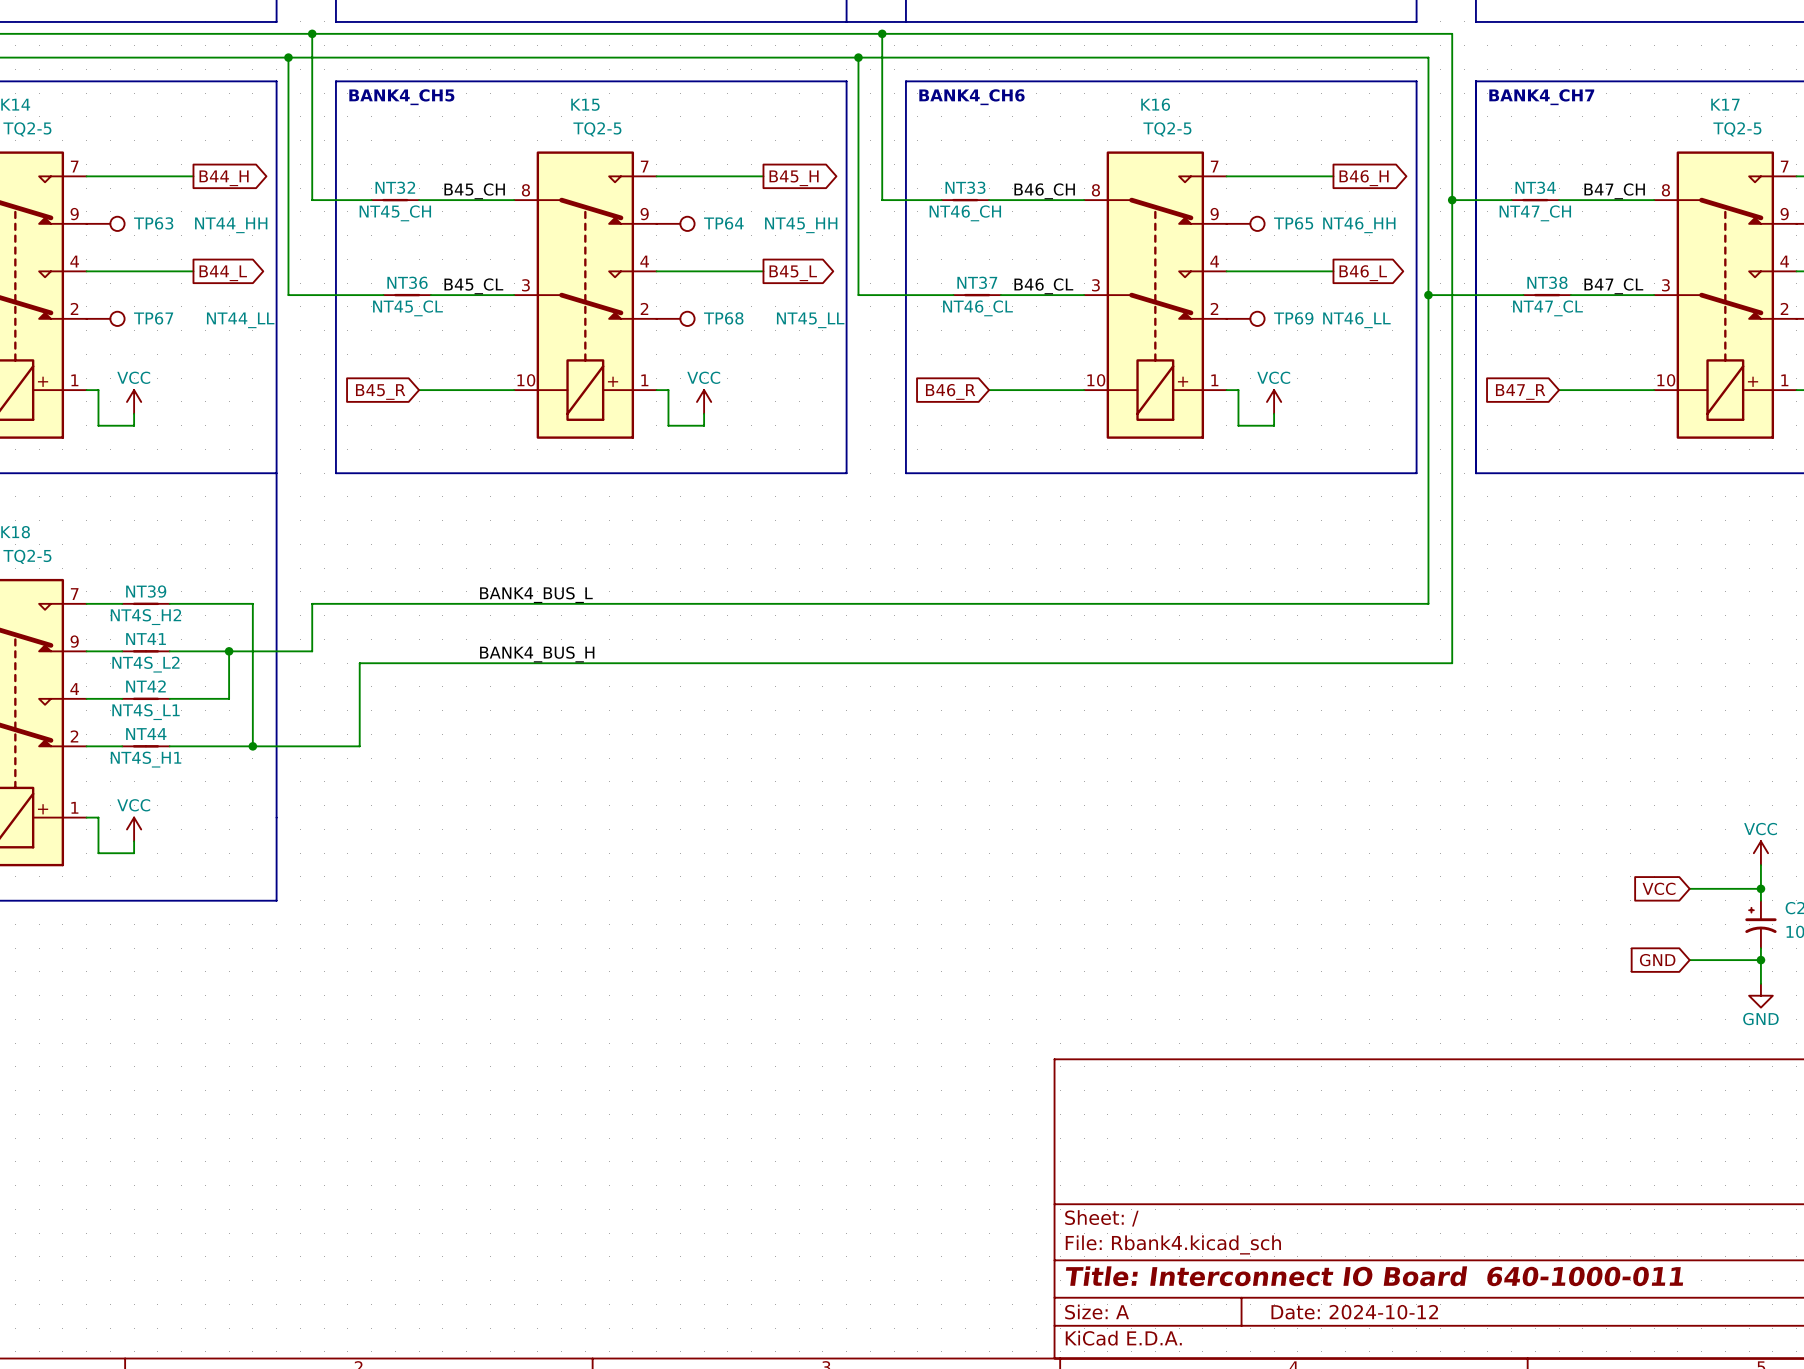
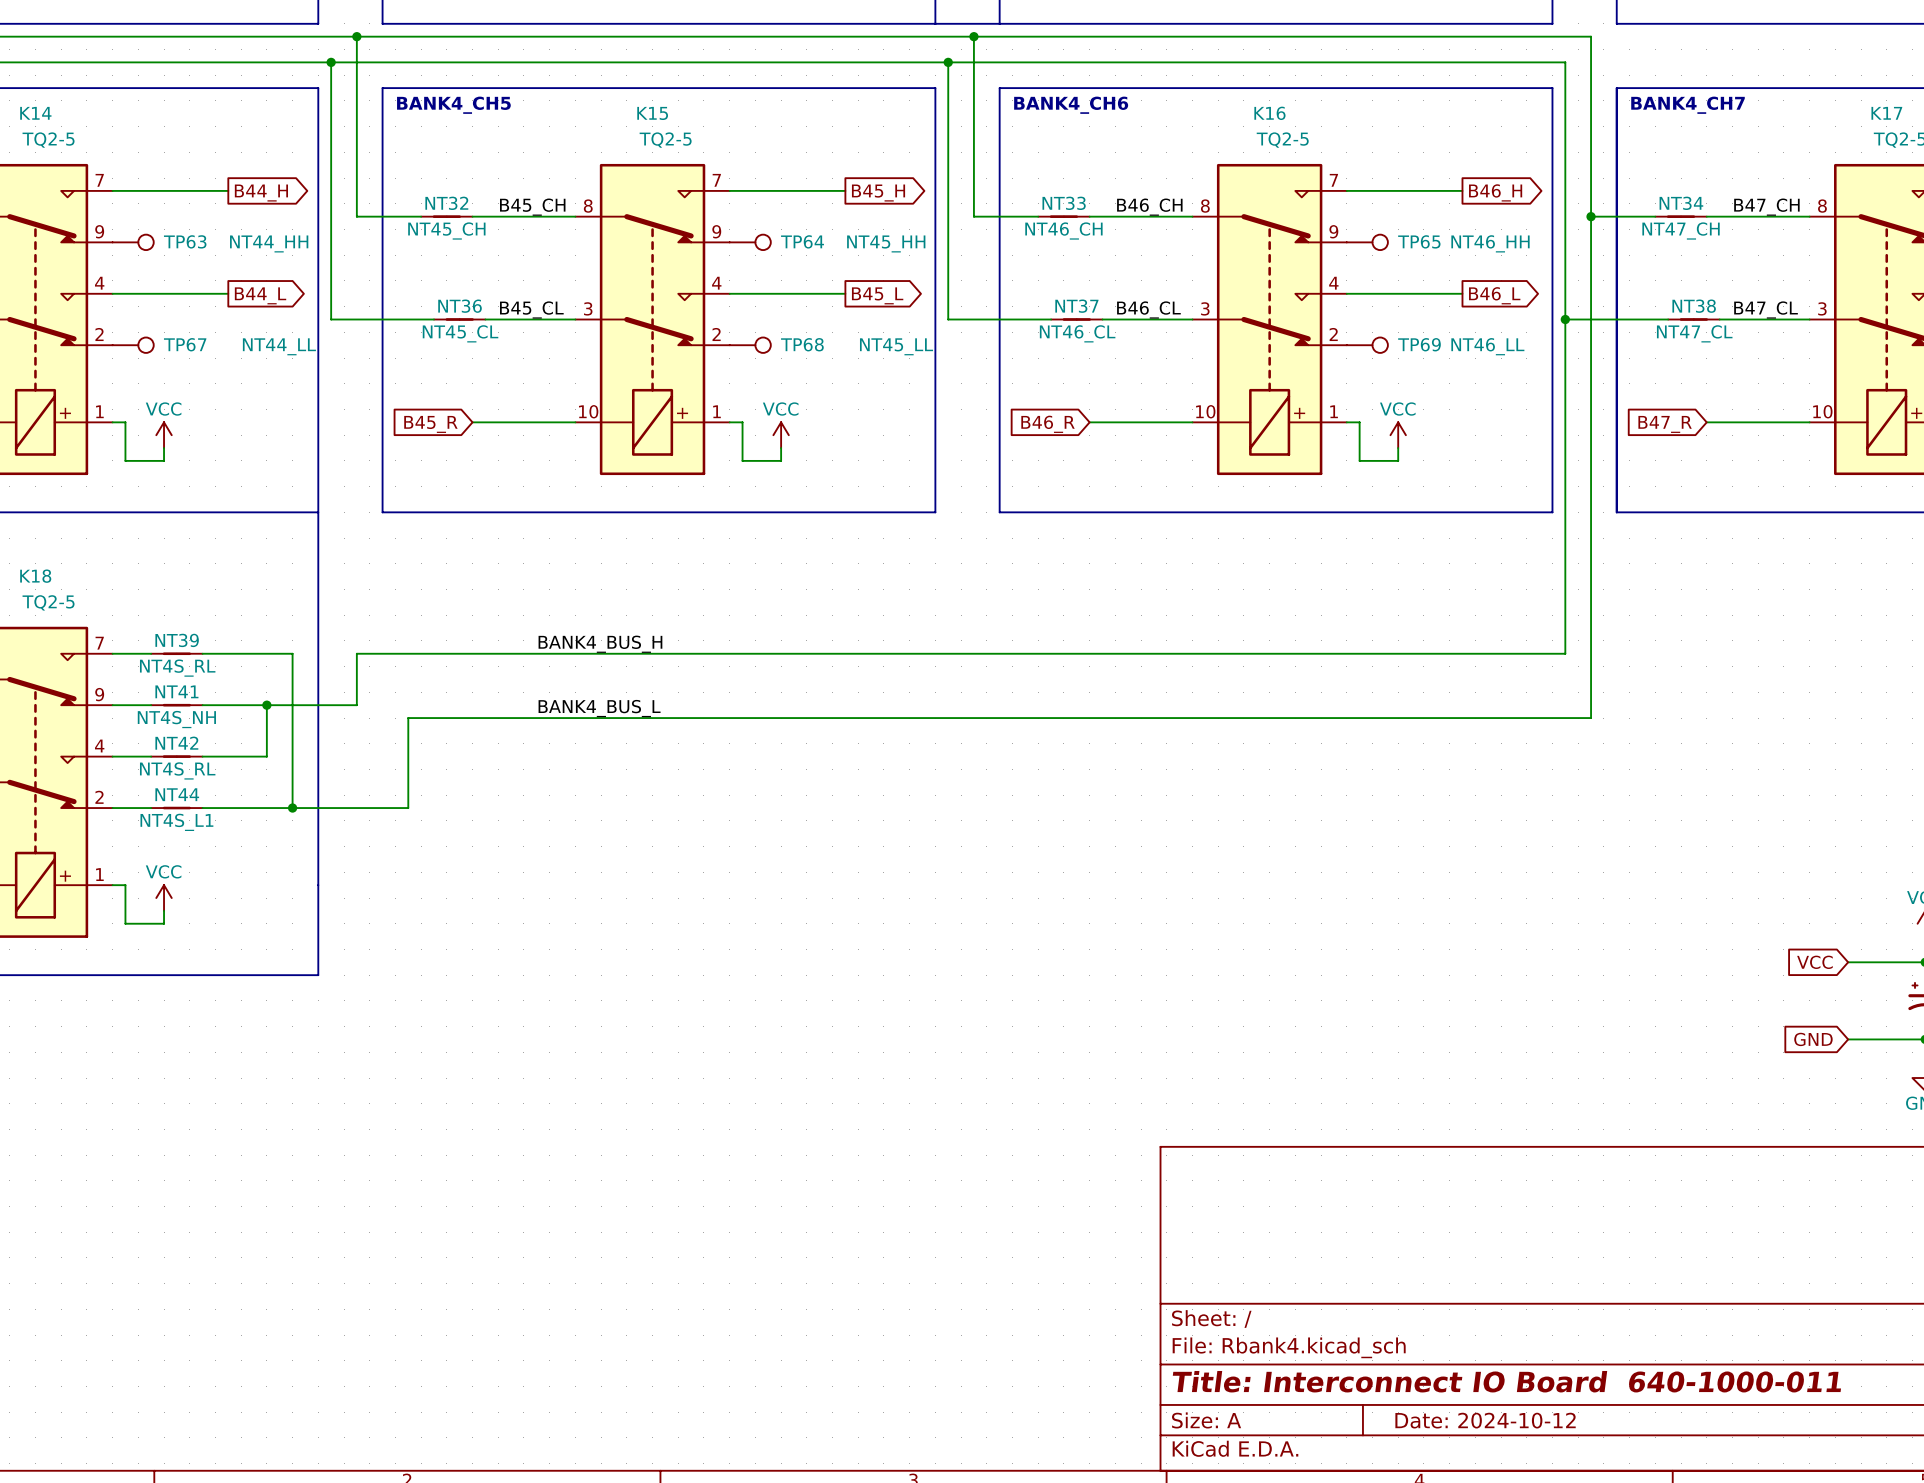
label: BANK4_BUS_L (536, 595) -> BANK4_BUS_H (600, 644)
NT39 value: NT4S_H2 (145, 617) -> NT4S_RL (177, 668)
label: BANK4_BUS_H (537, 654) -> BANK4_BUS_L (599, 708)
NT41 value: NT4S_L2 (145, 664) -> NT4S_NH (176, 719)
NT42 value: NT4S_L1 (146, 712) -> NT4S_RL (177, 770)
NT44 value: NT4S_H1 (146, 759) -> NT4S_L1 (176, 822)

